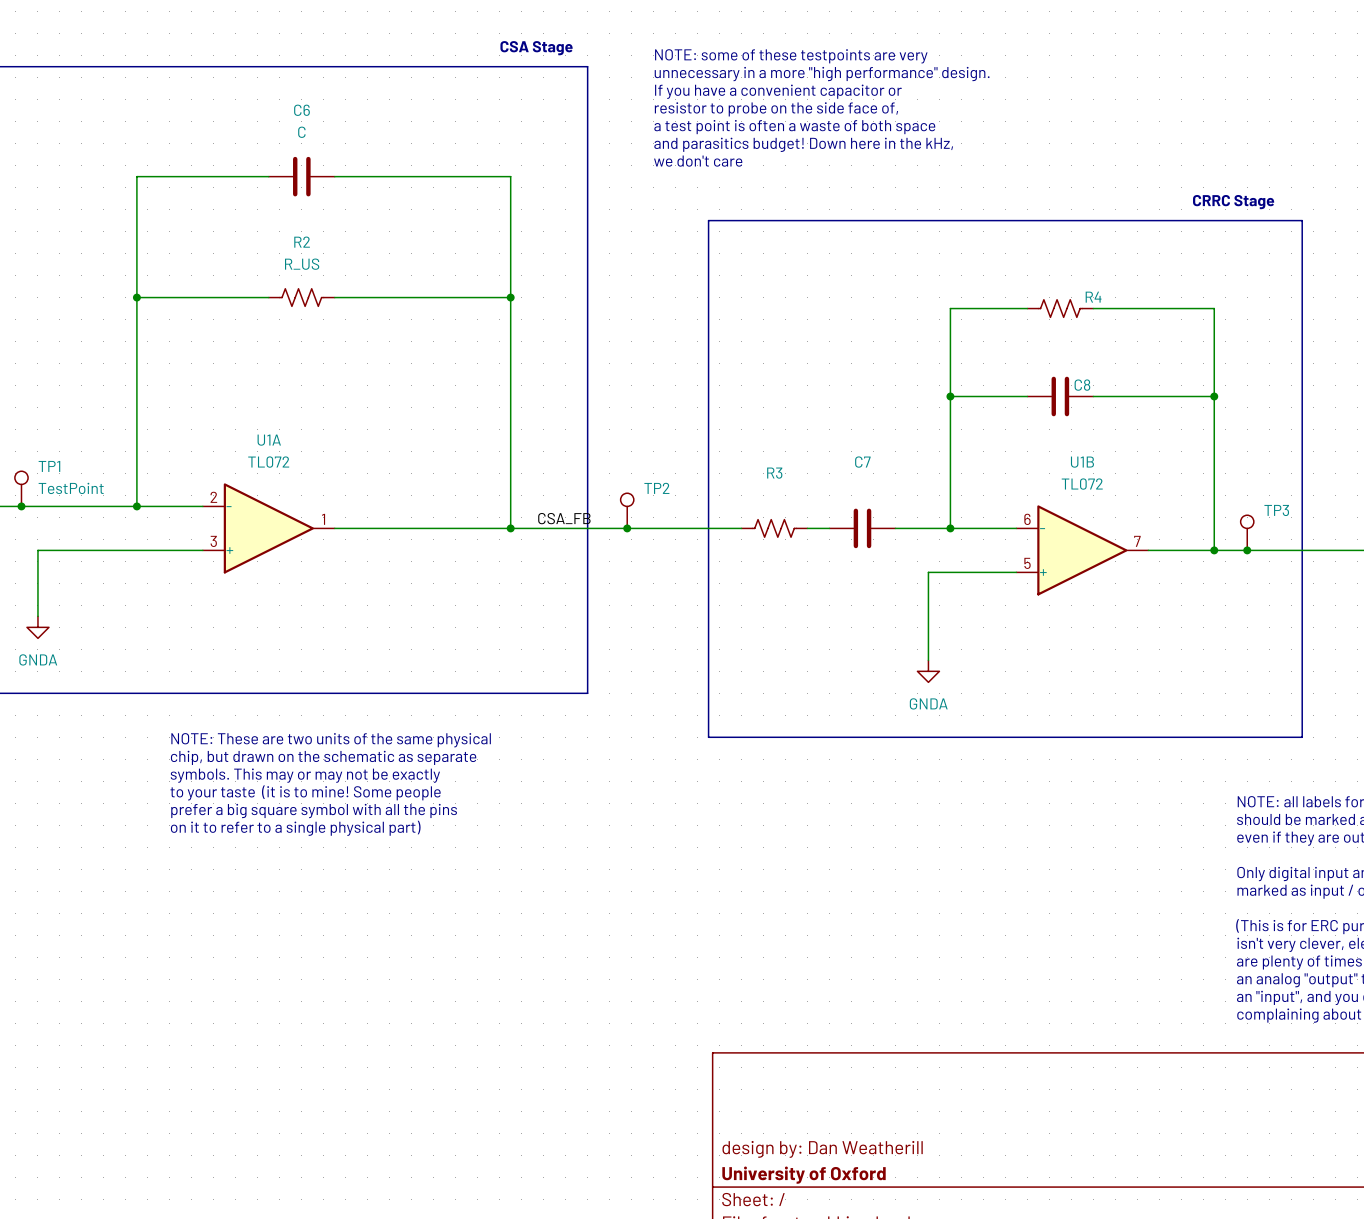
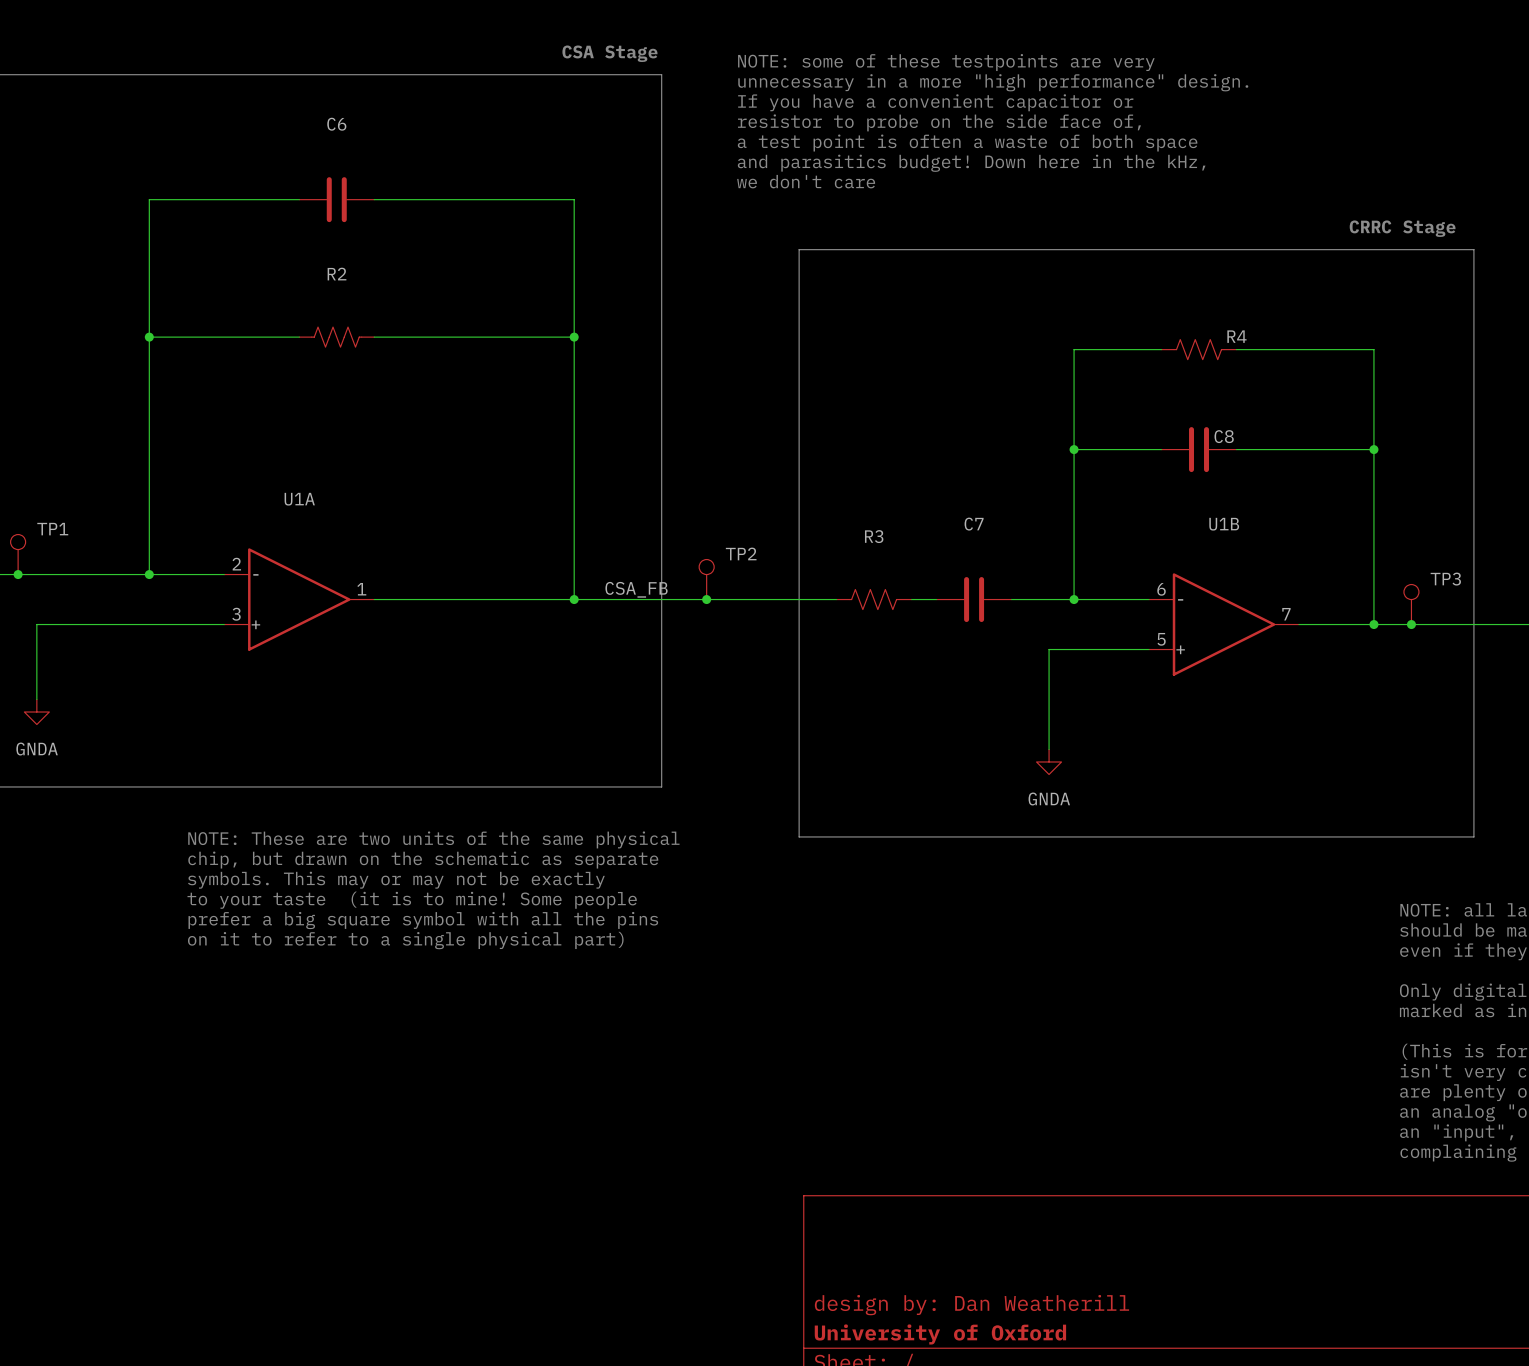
C6 value: C (301, 132) -> none
R2 value: R_US (302, 264) -> none
U1A value: TL072 (268, 462) -> none
U1B value: TL072 (1082, 484) -> none
TP1 value: TestPoint (71, 488) -> none

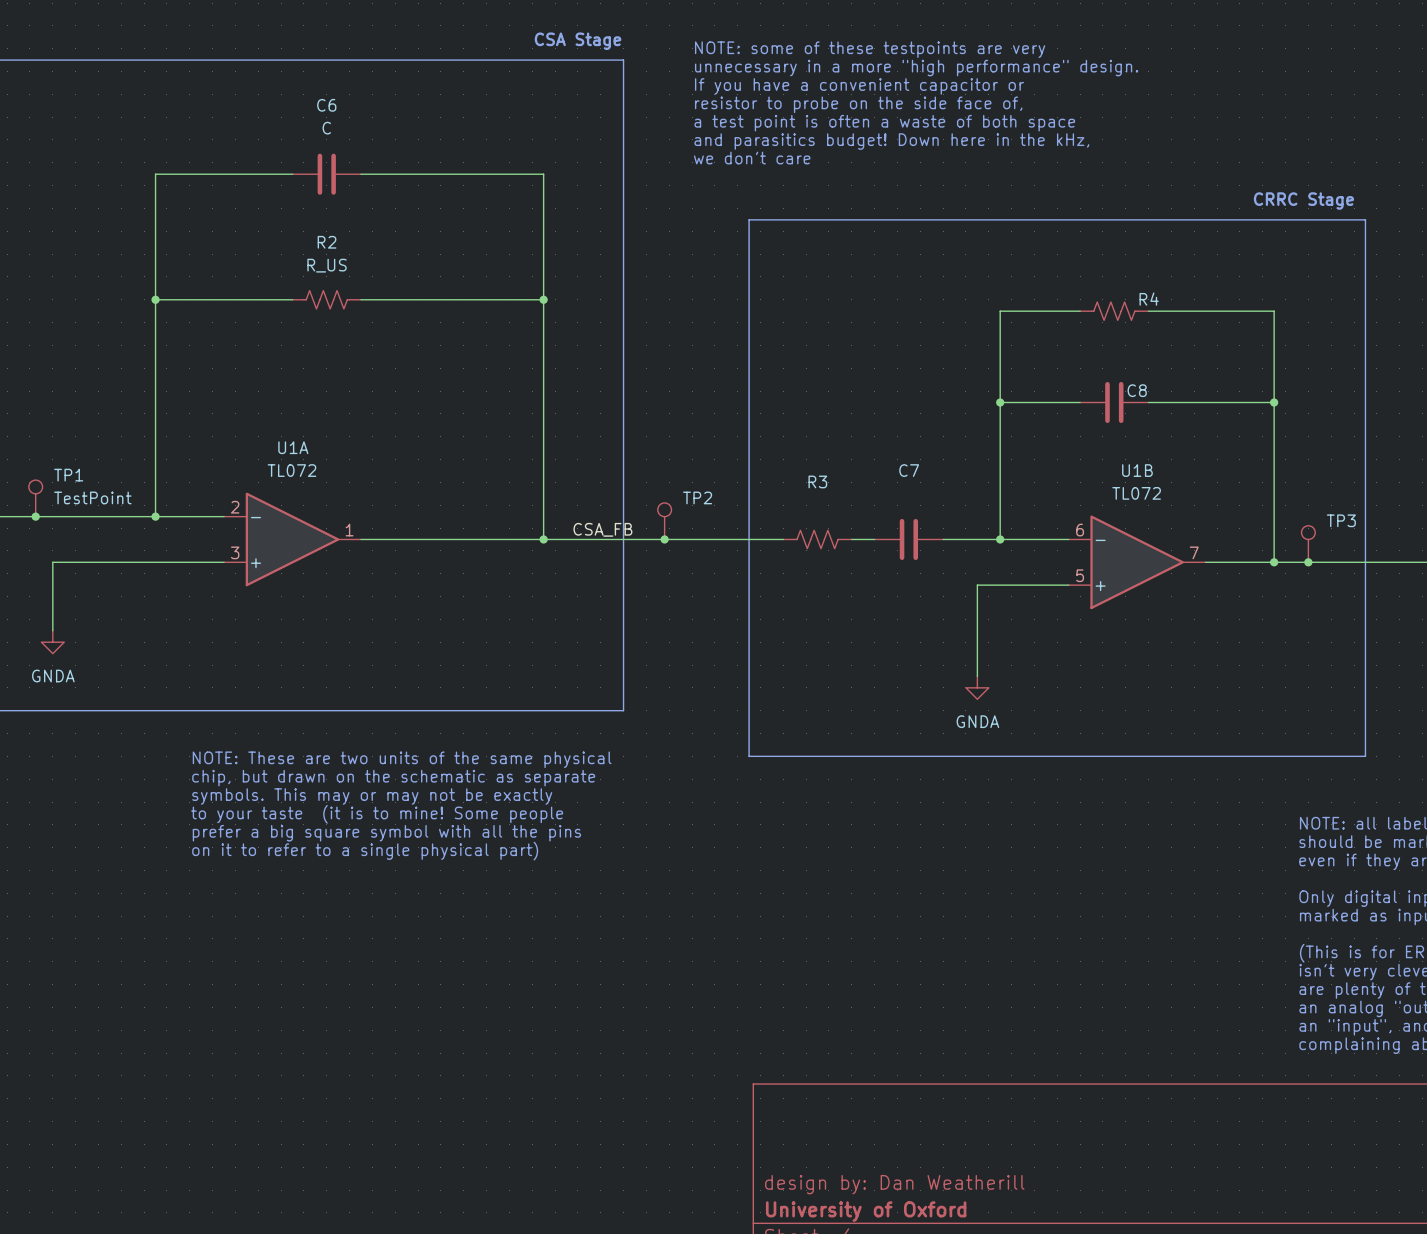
C6 value: none -> C (326, 128)
R2 value: none -> R_US (327, 265)
U1A value: none -> TL072 (291, 470)
U1B value: none -> TL072 (1136, 493)
TP1 value: none -> TestPoint (92, 497)

